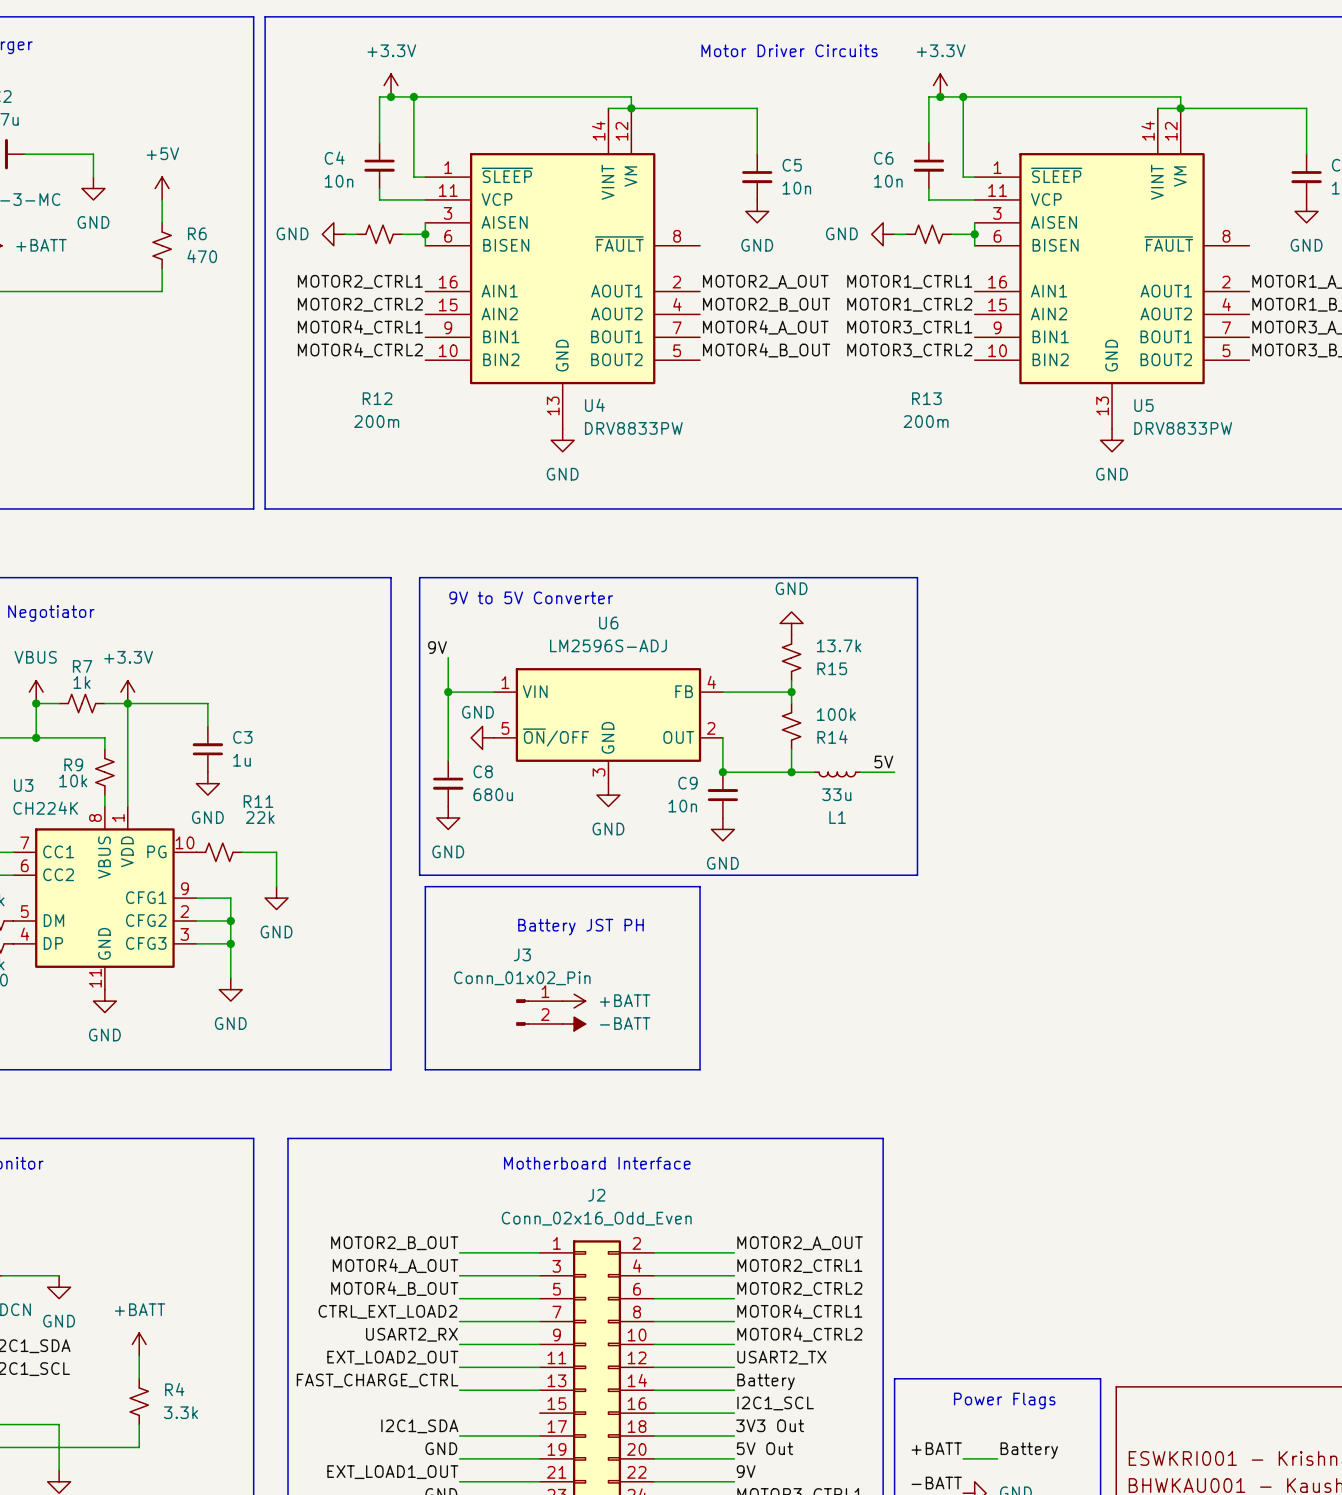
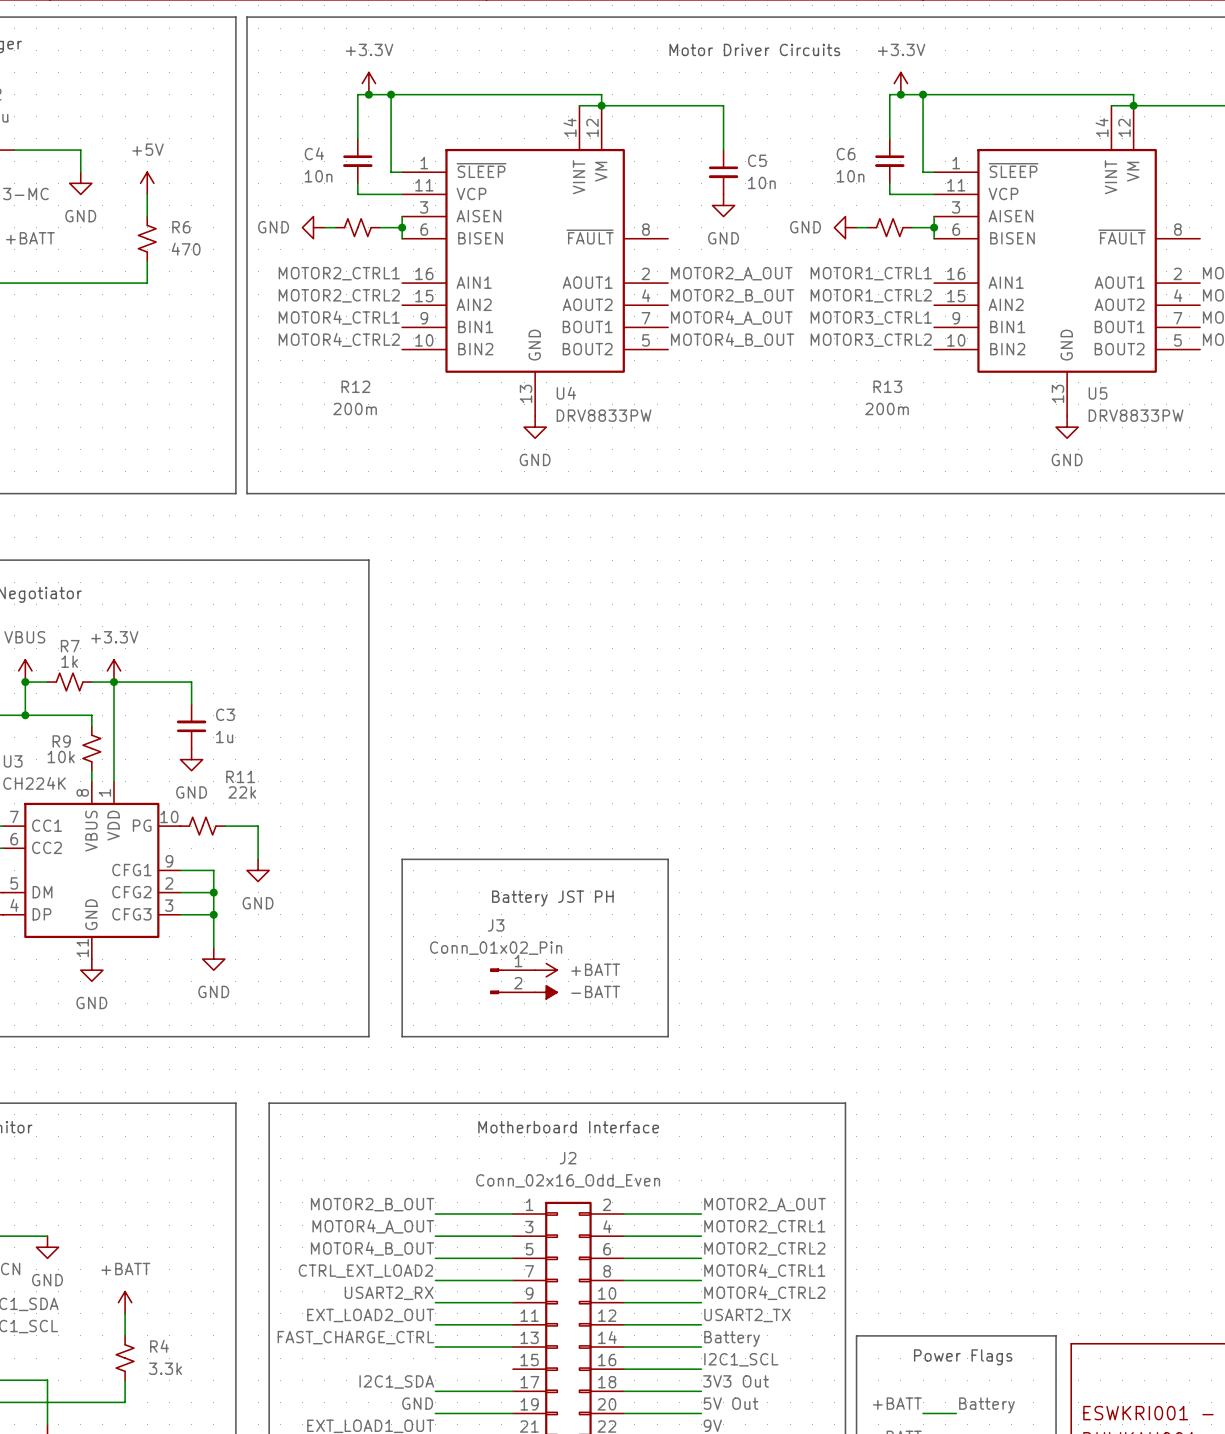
line: (419, 577) (917, 577) (917, 875) (419, 875) (419, 577) -> none
text: 9V to 5V Converter (531, 597) -> none
power symbol: GND (791, 623) -> none
label: 9V (437, 647) -> none
wire: (448, 657) (448, 760) -> none
R15: 13.7k (791, 657) -> none
wire: (791, 680) (791, 703) -> none
wire: (448, 692) (494, 692) -> none
junction: (448, 692) -> none
wire: (722, 692) (791, 692) -> none
junction: (791, 692) -> none
U6: LM2596S-ADJ (608, 725) -> none
R14: 100k (791, 726) -> none
power symbol: GND (482, 737) -> none
wire: (722, 737) (722, 772) (814, 772) -> none
wire: (791, 749) (791, 772) -> none
label: 5V (883, 761) -> none
junction: (722, 772) -> none
junction: (791, 772) -> none
wire: (860, 772) (894, 772) -> none
L1: 33u (837, 774) -> none
C8: 680u (448, 783) -> none
power symbol: GND (608, 795) -> none
C9: 10n (722, 795) -> none
power symbol: GND (448, 817) -> none
power symbol: GND (722, 829) -> none

